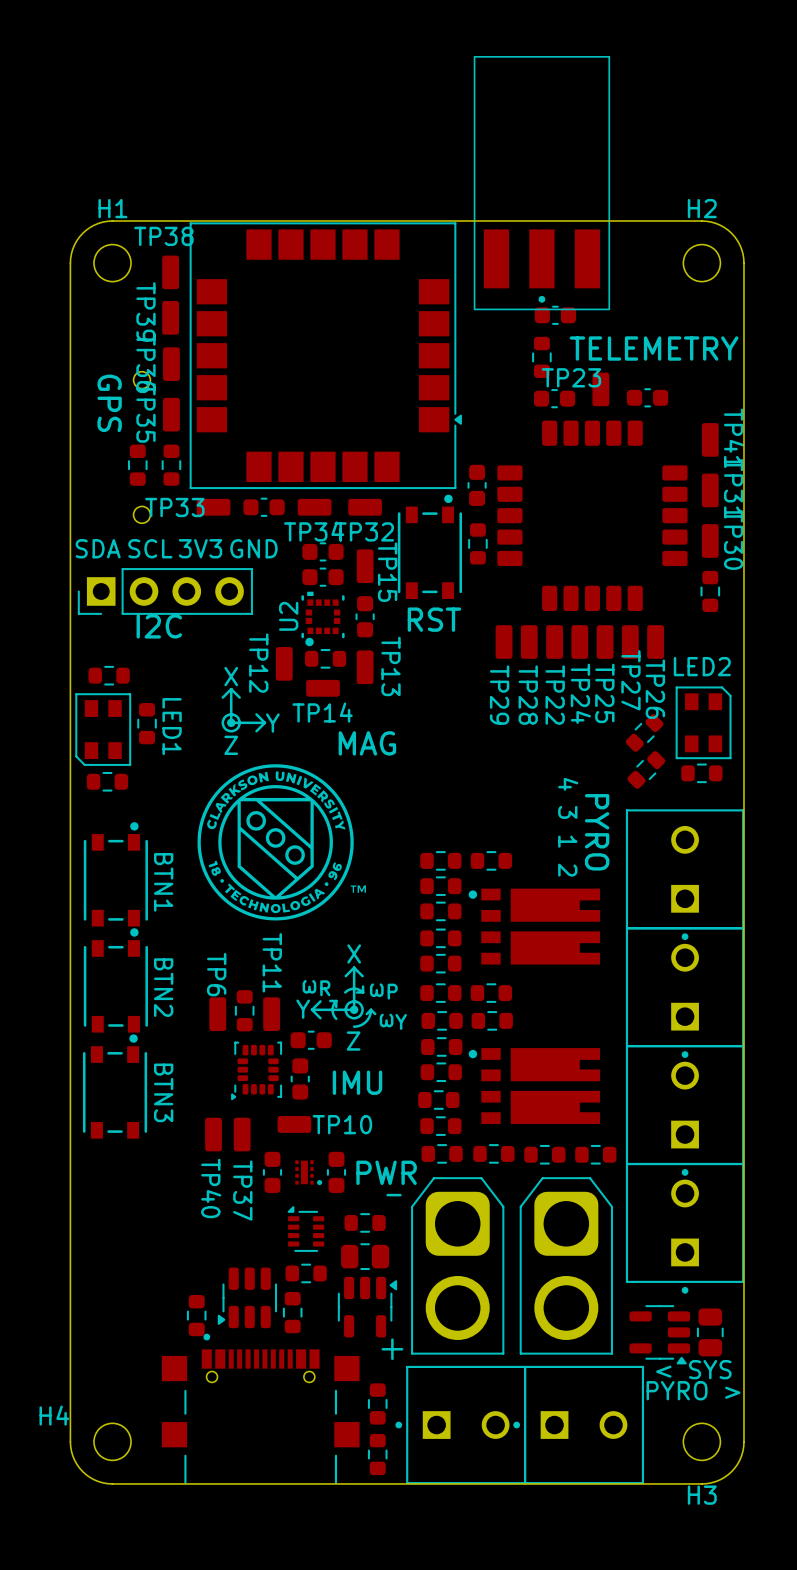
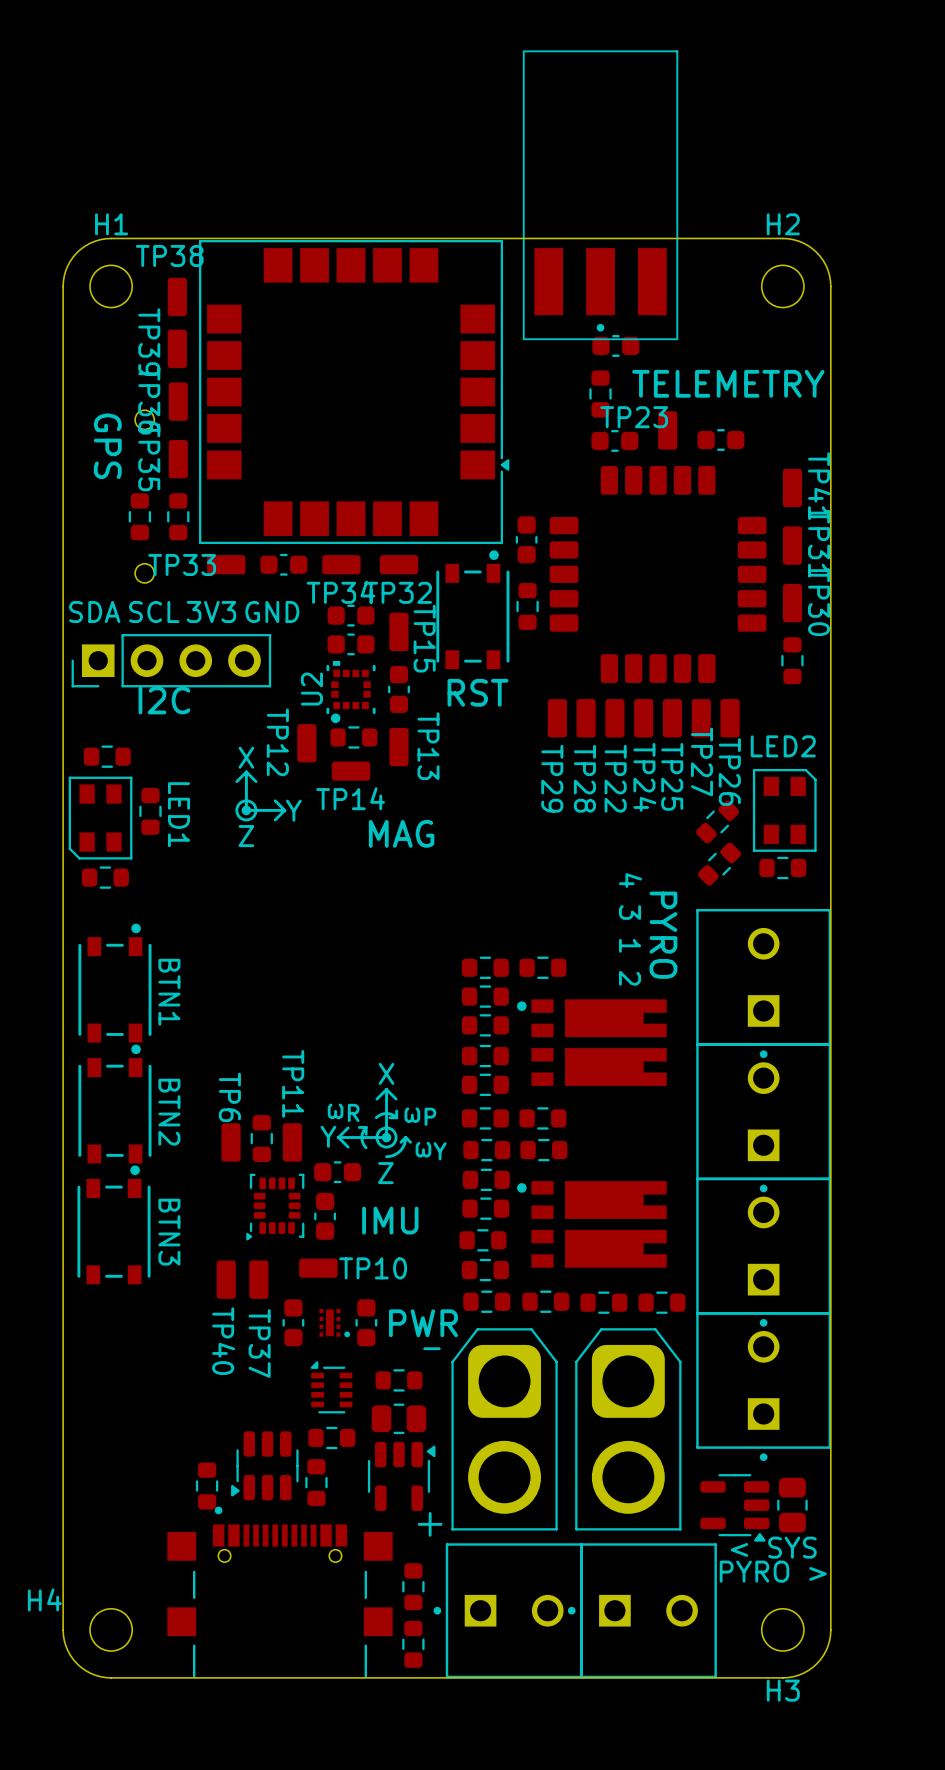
drawing: [197, 764, 366, 921] -> none

